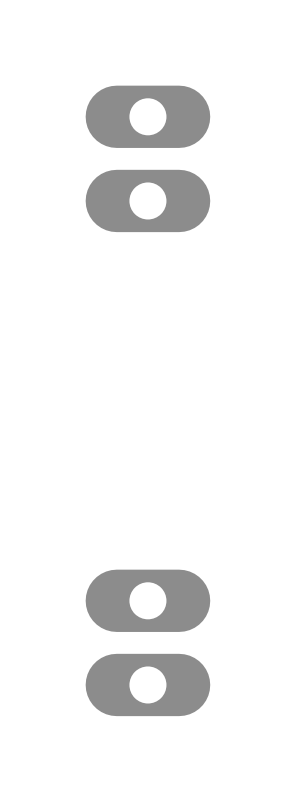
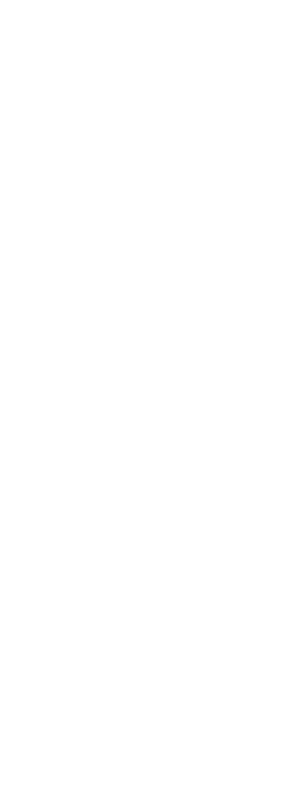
part: (147, 158) -> none
part: (147, 642) -> none

